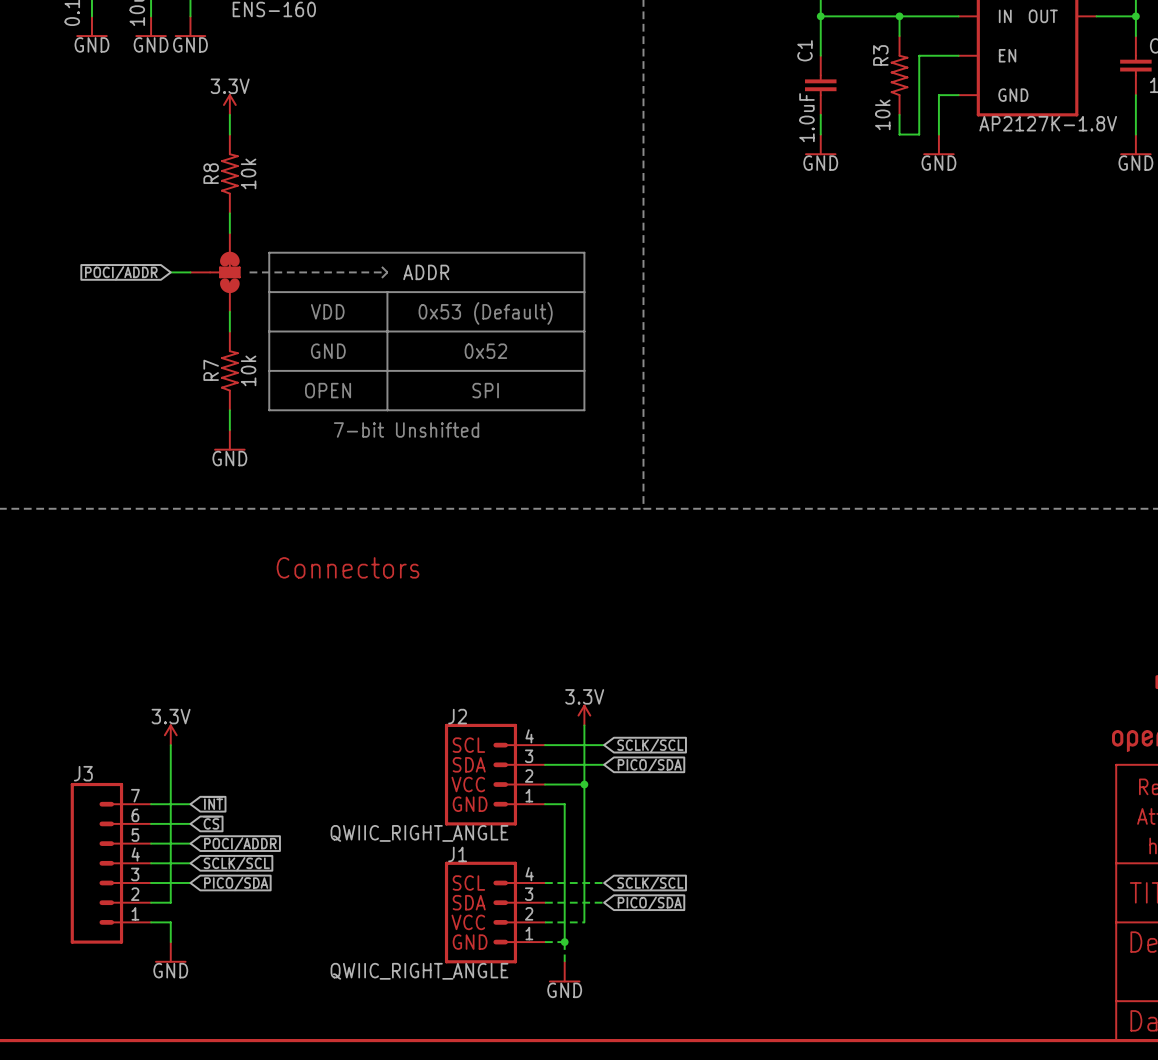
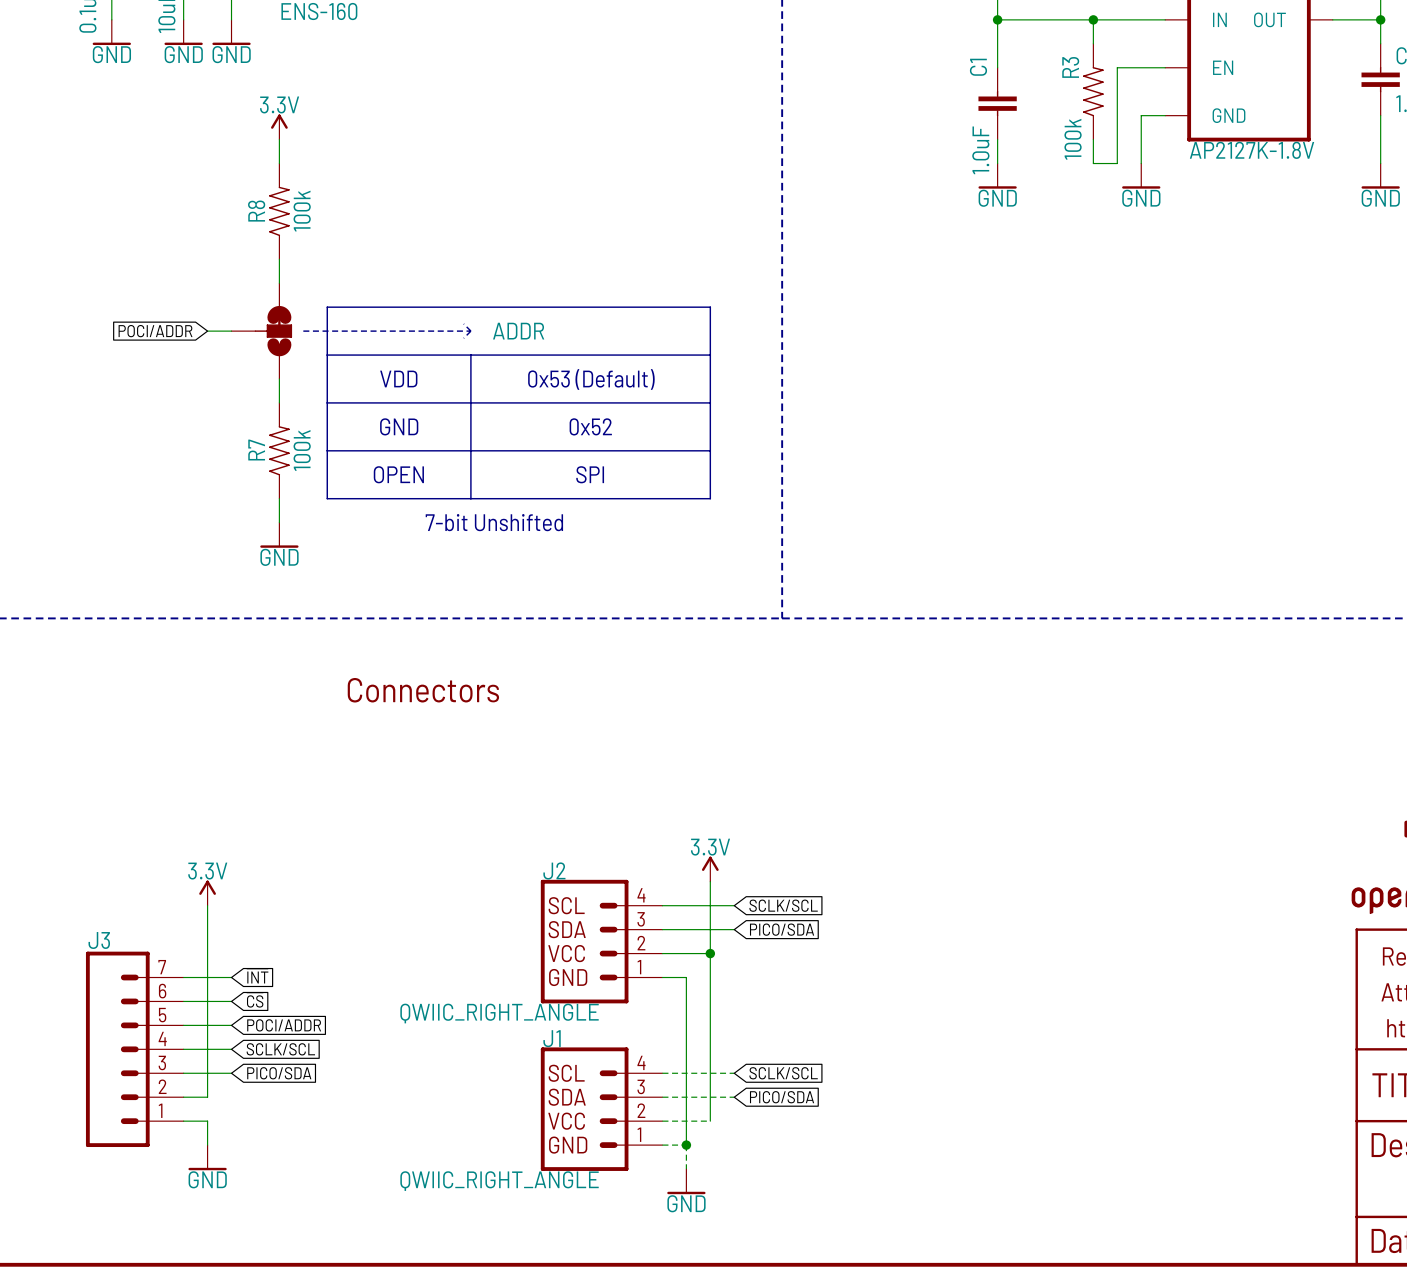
R3 value: 10k (882, 114) -> 100k (1073, 139)
R8 value: 10k (248, 173) -> 100k (302, 211)
R7 value: 10k (248, 370) -> 100k (302, 450)

